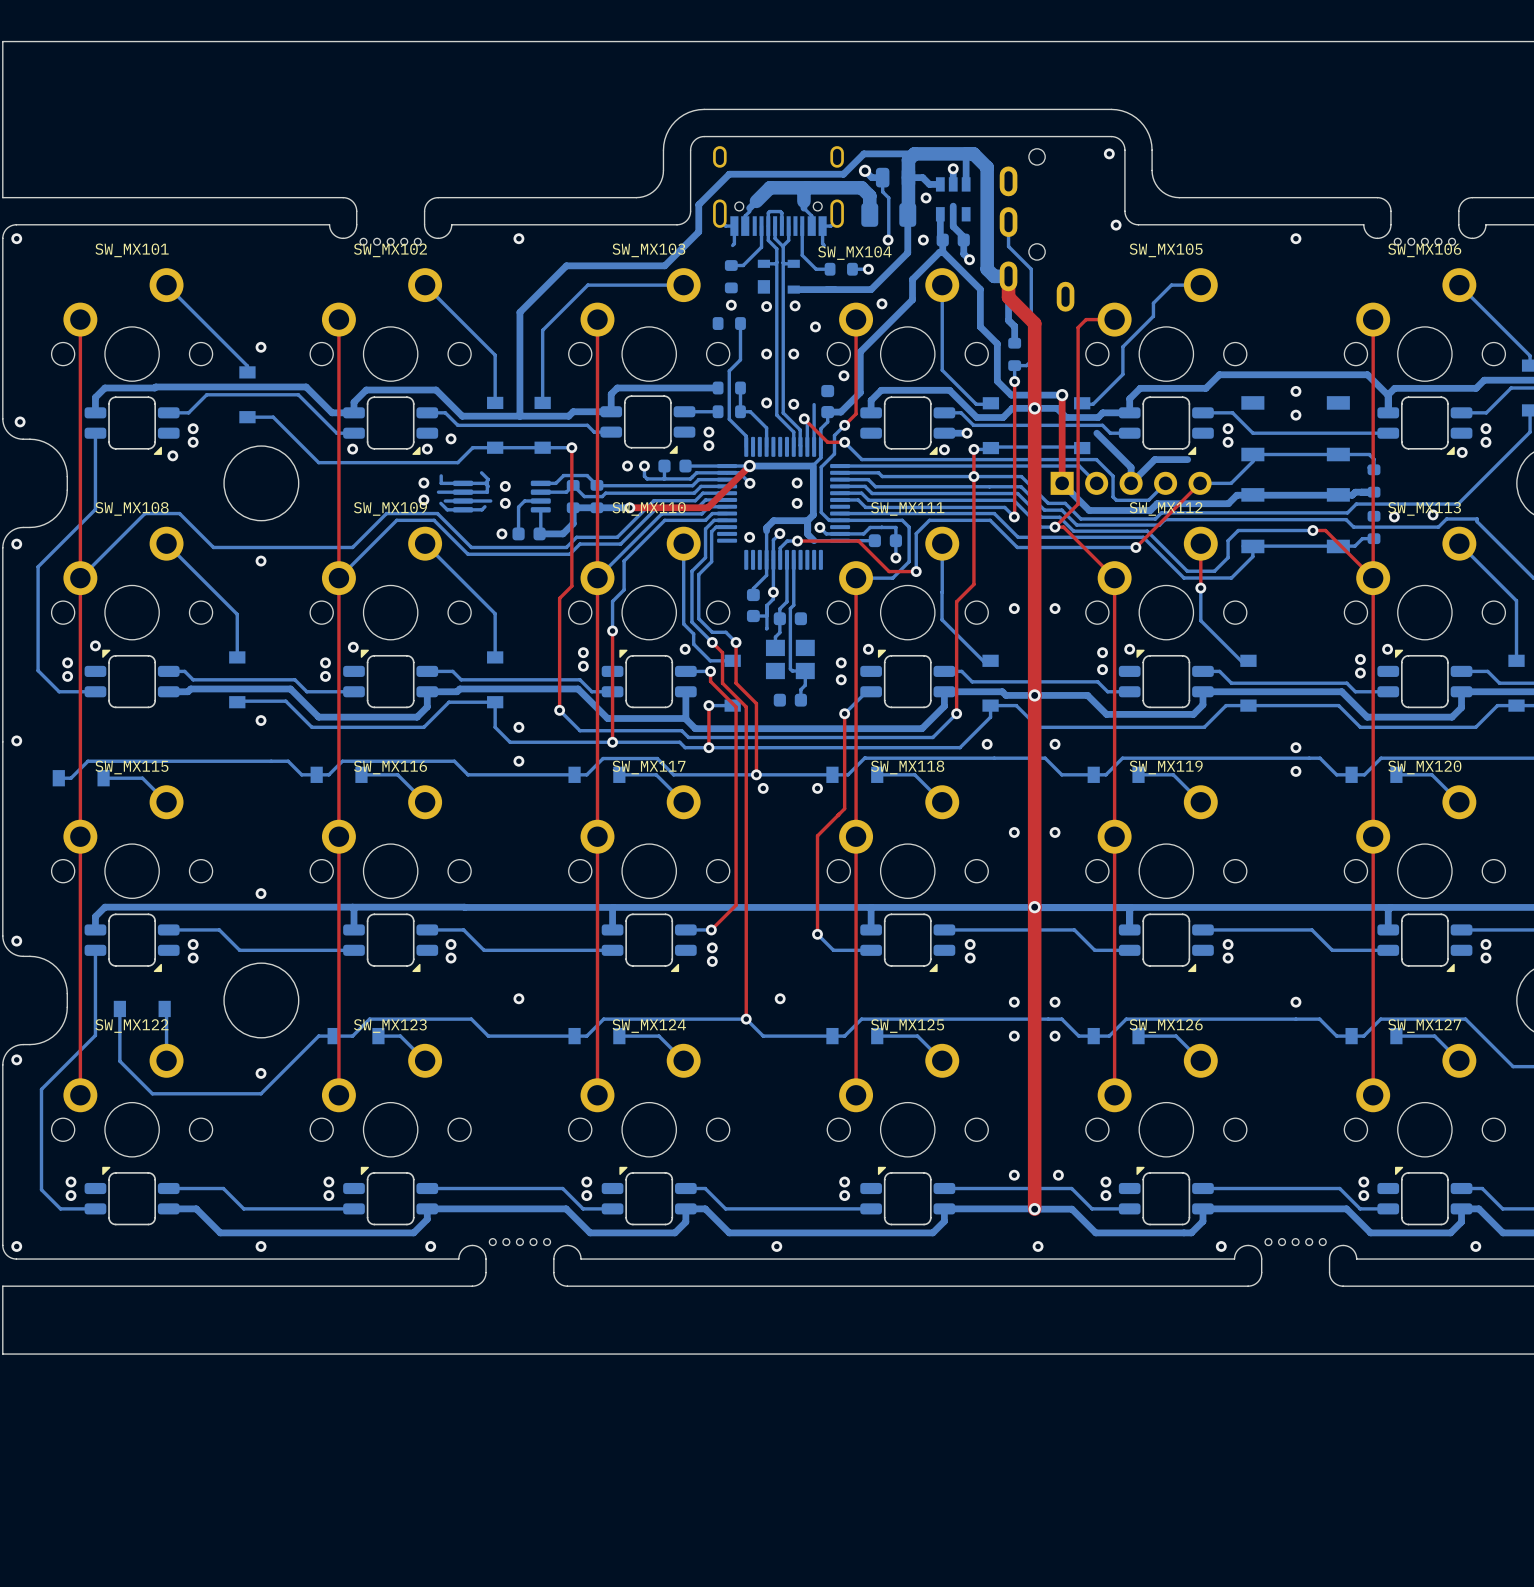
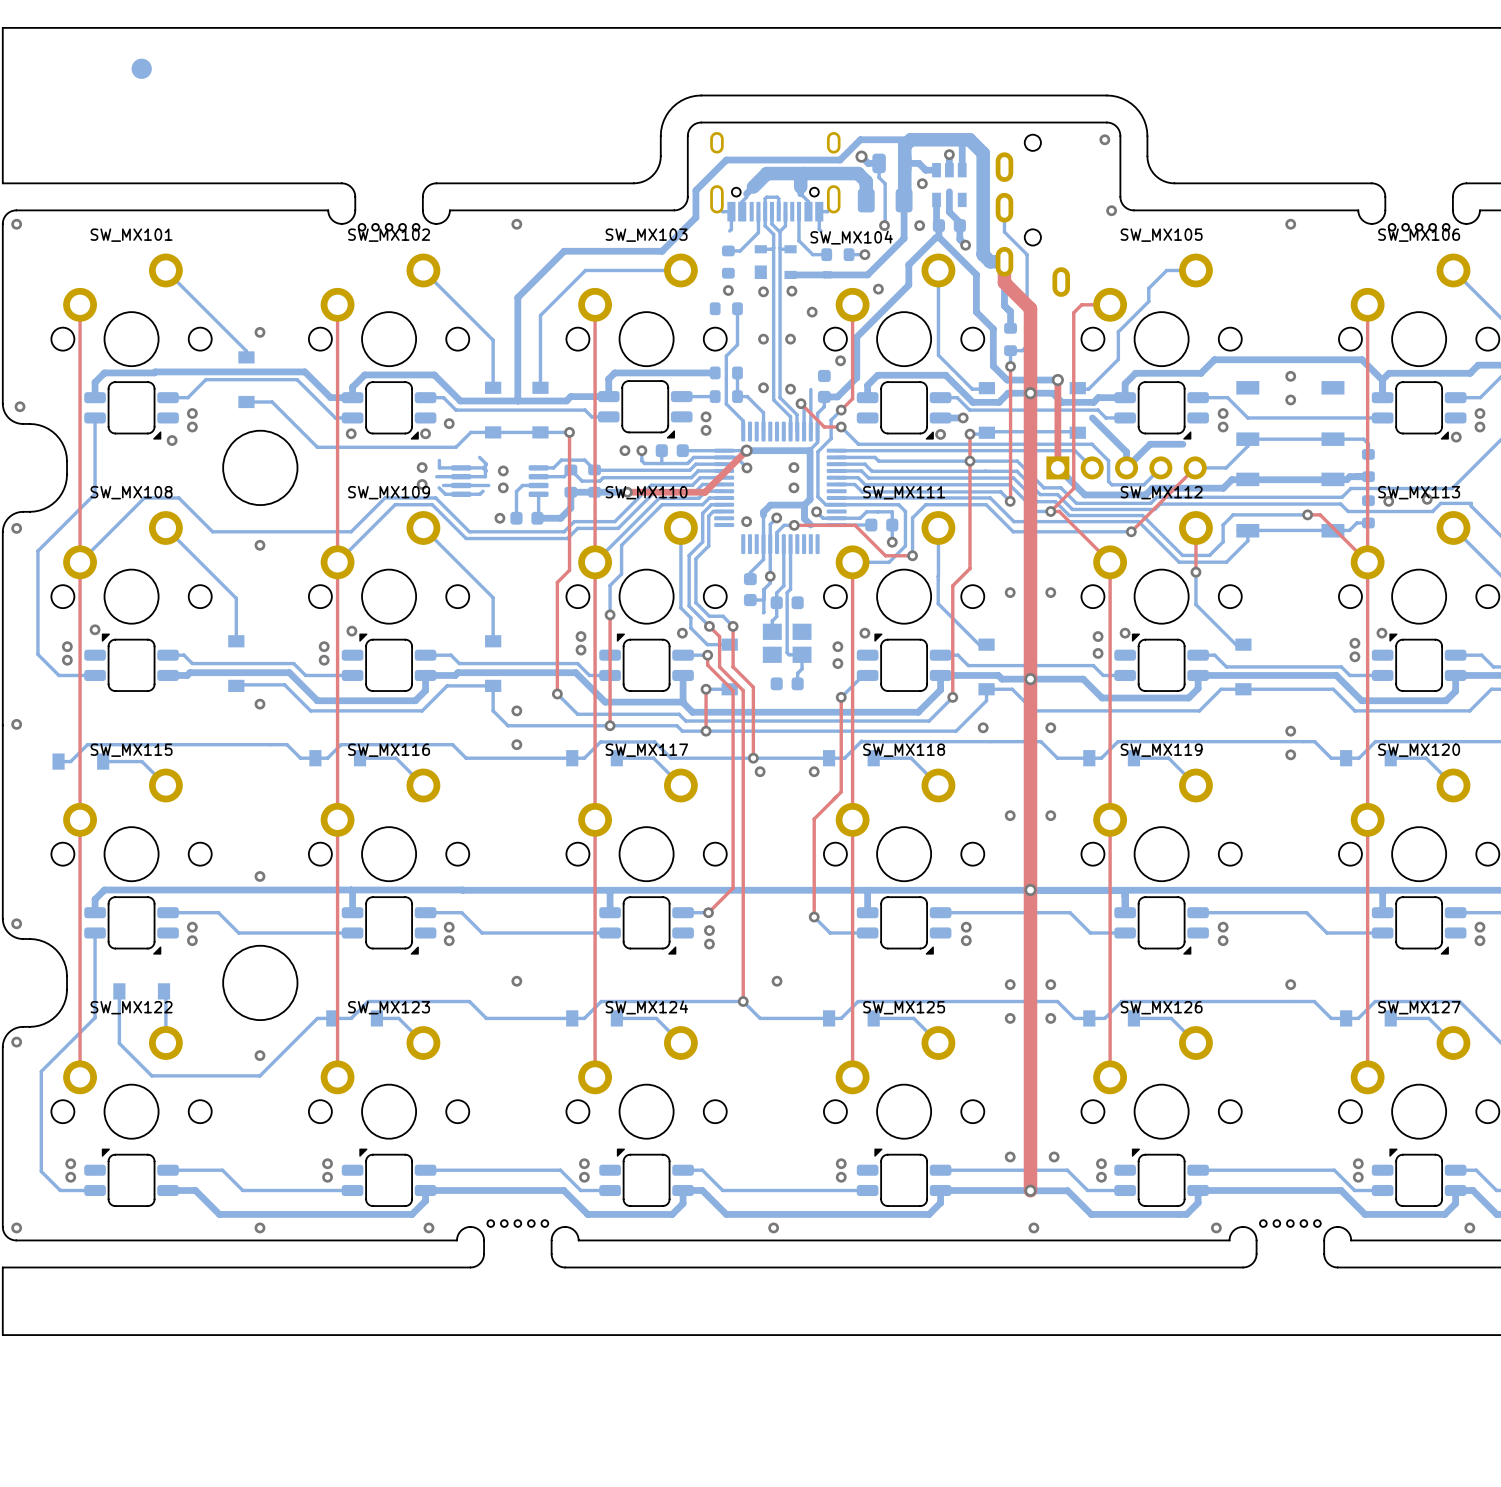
part: none -> (141, 68)

